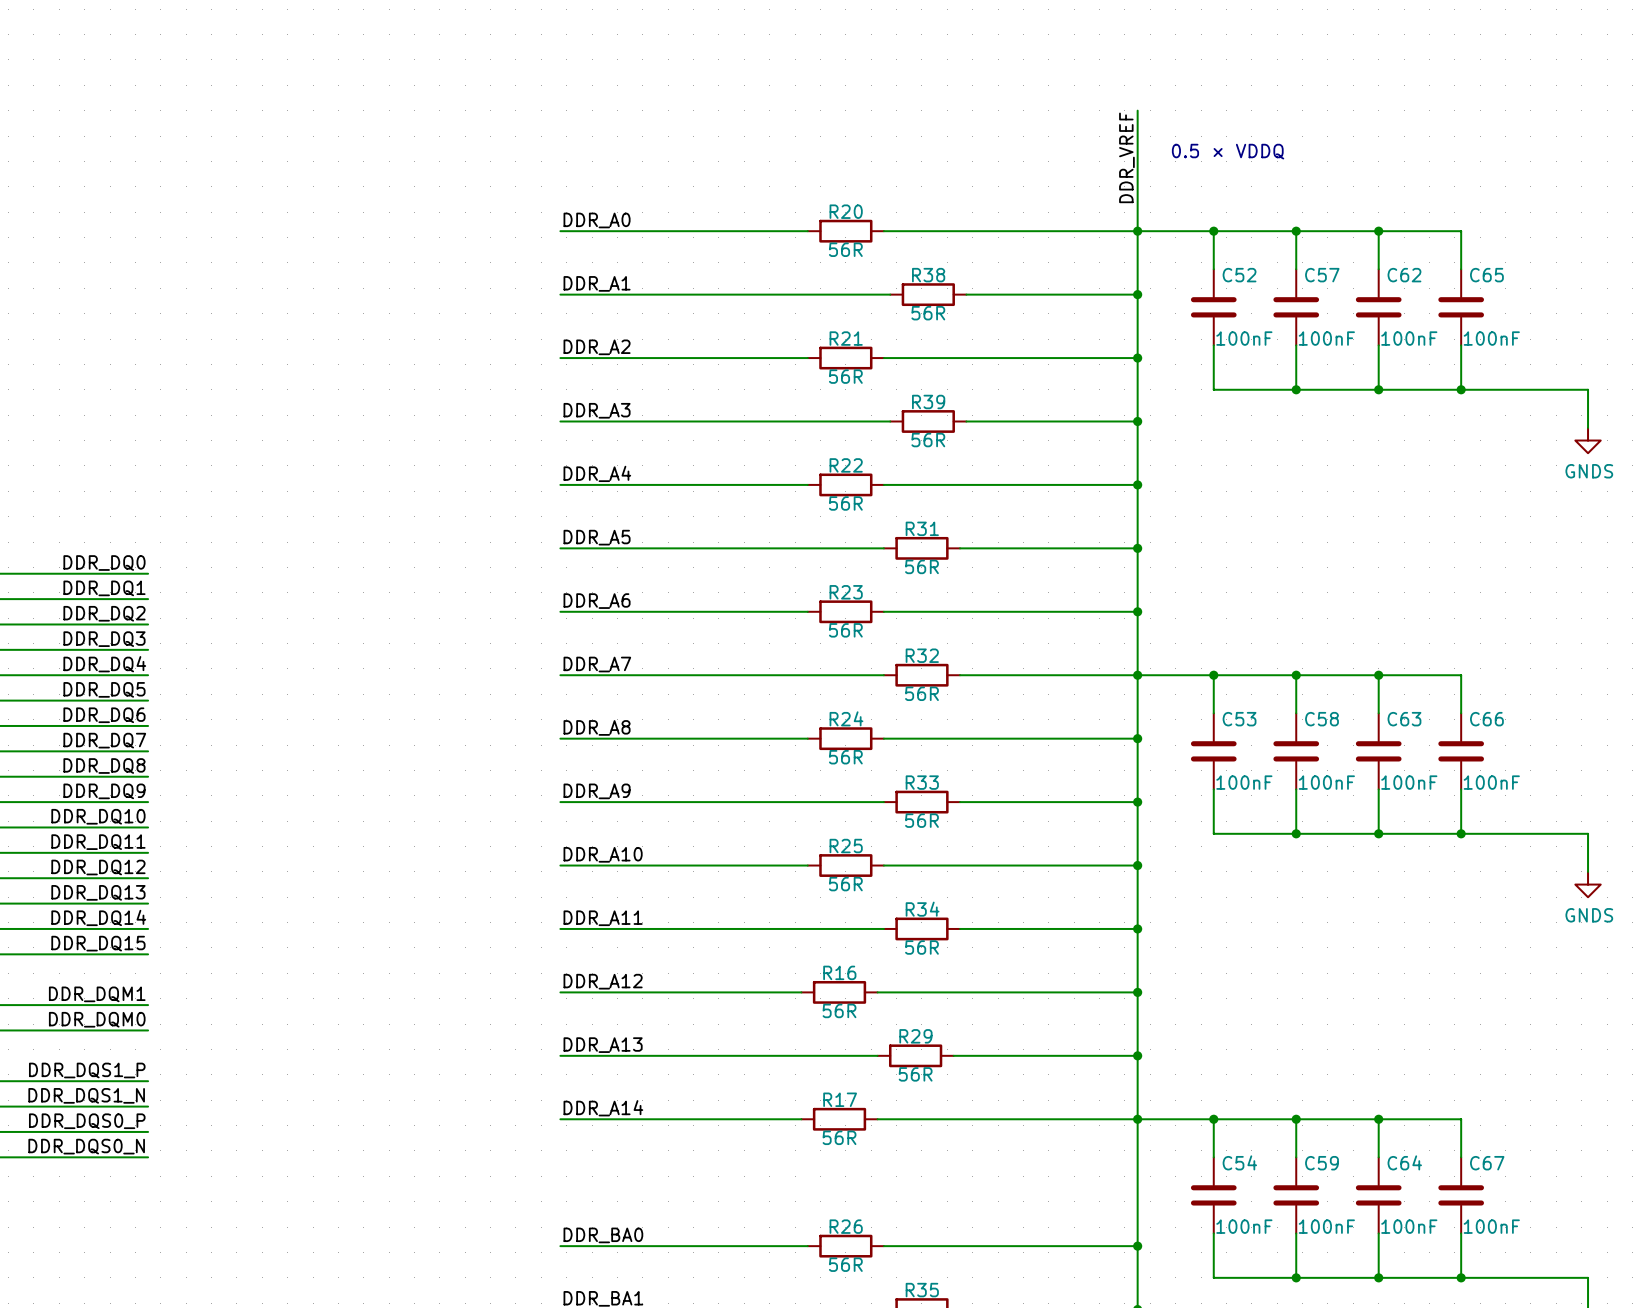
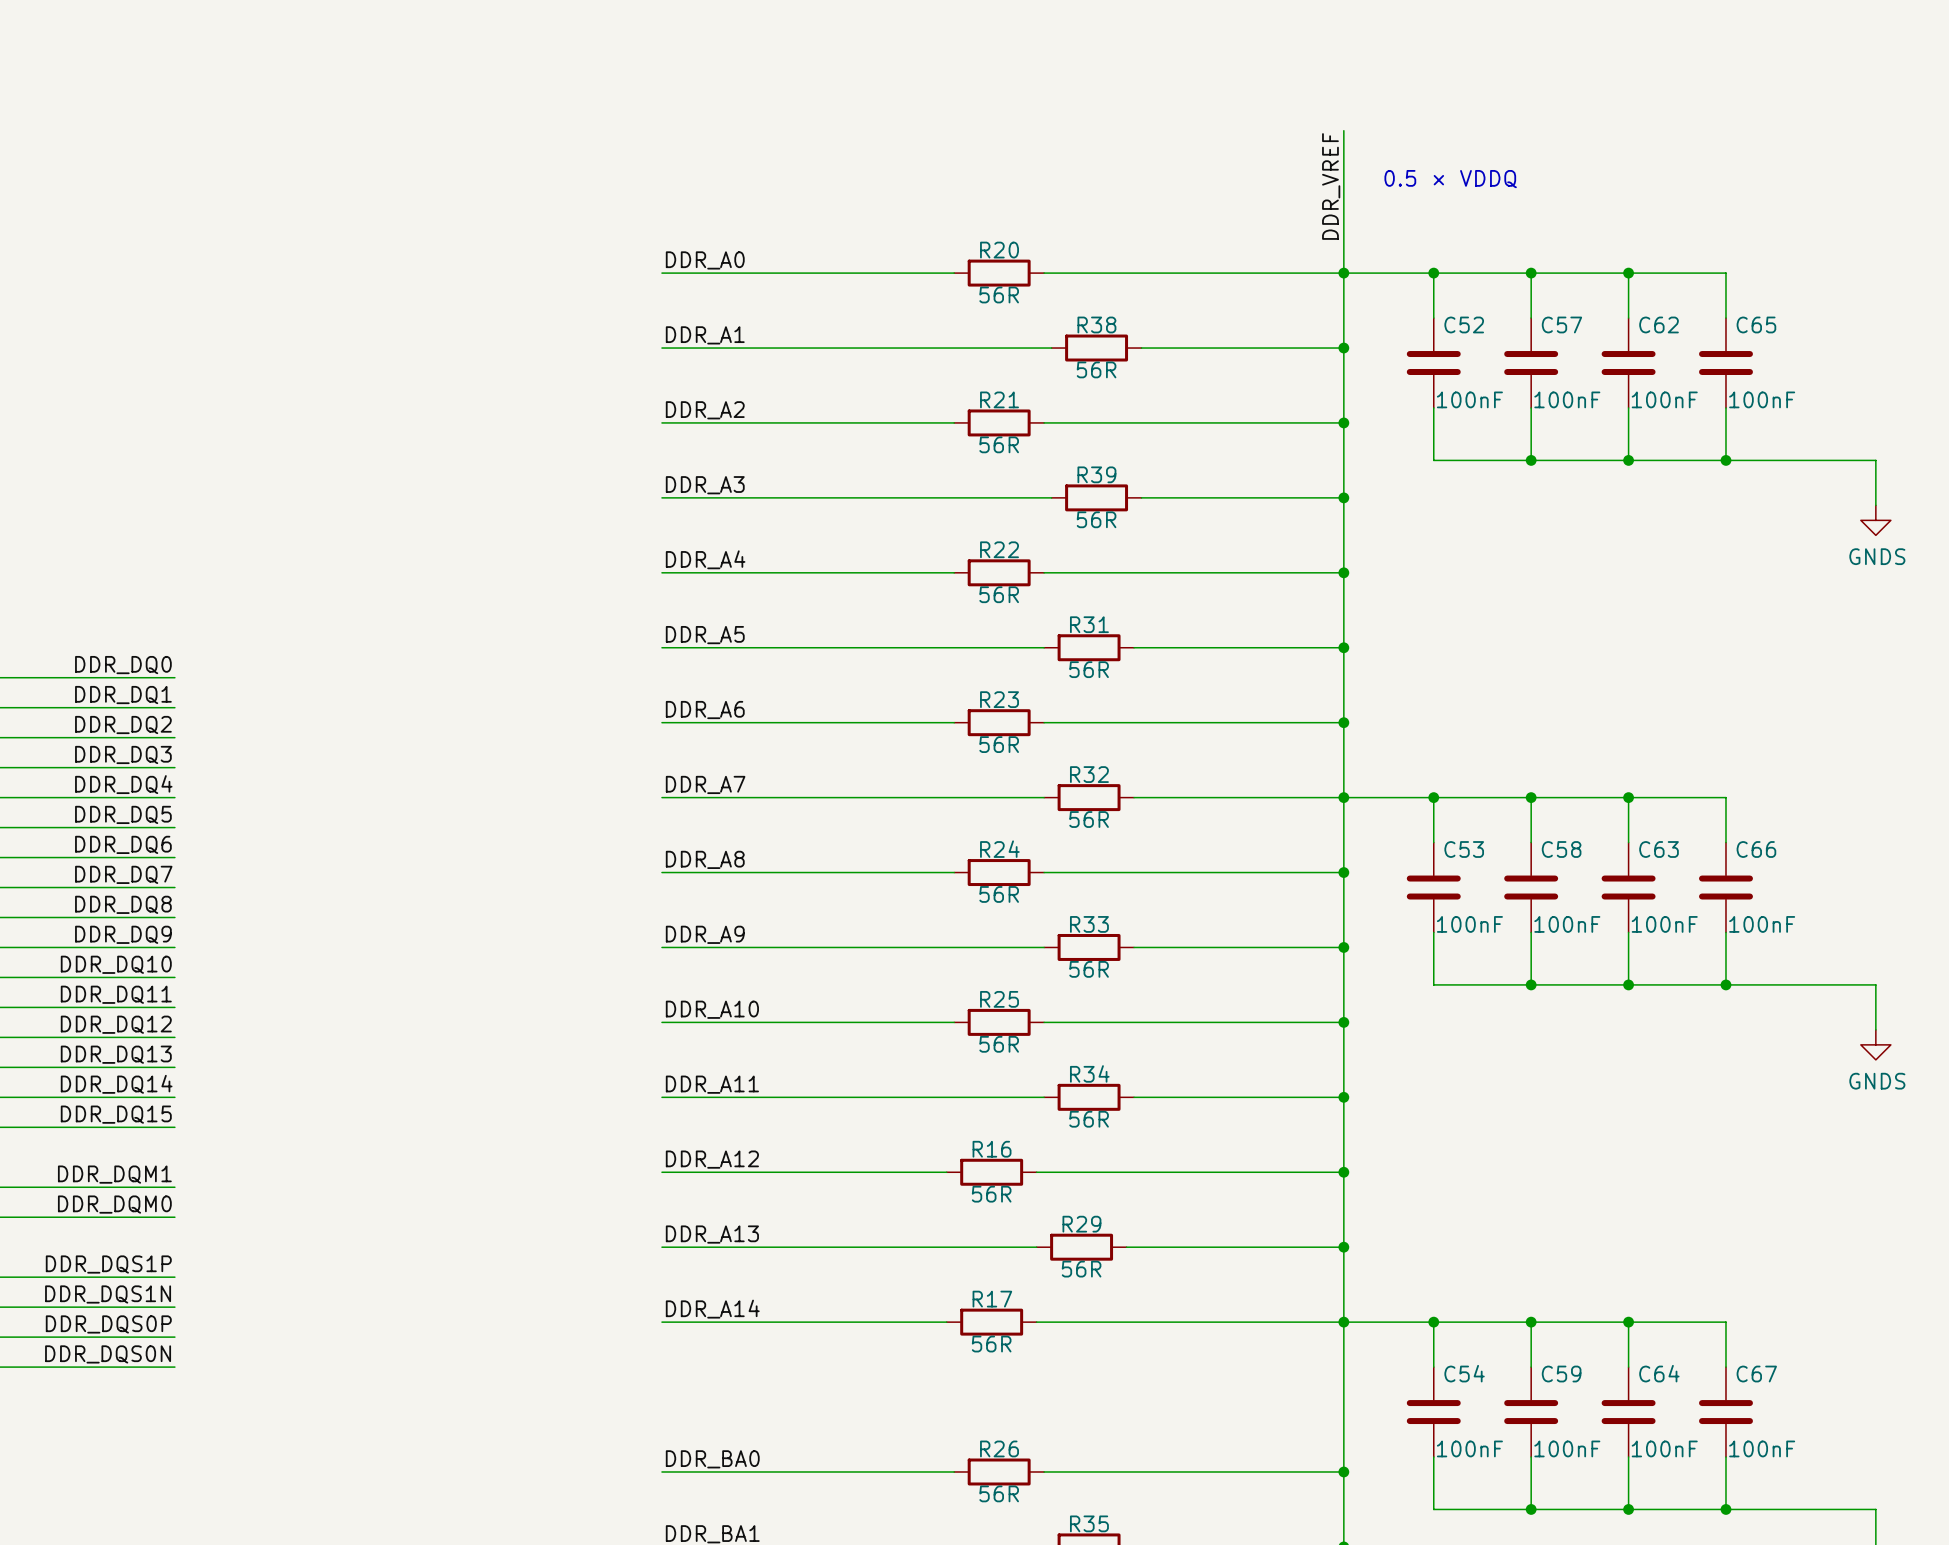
label: DDR_DQS1_P (87, 1070) -> DDR_DQS1P (108, 1264)
label: DDR_DQS1_N (86, 1095) -> DDR_DQS1N (108, 1294)
label: DDR_DQS0_P (87, 1121) -> DDR_DQS0P (108, 1324)
label: DDR_DQS0_N (86, 1146) -> DDR_DQS0N (108, 1354)

